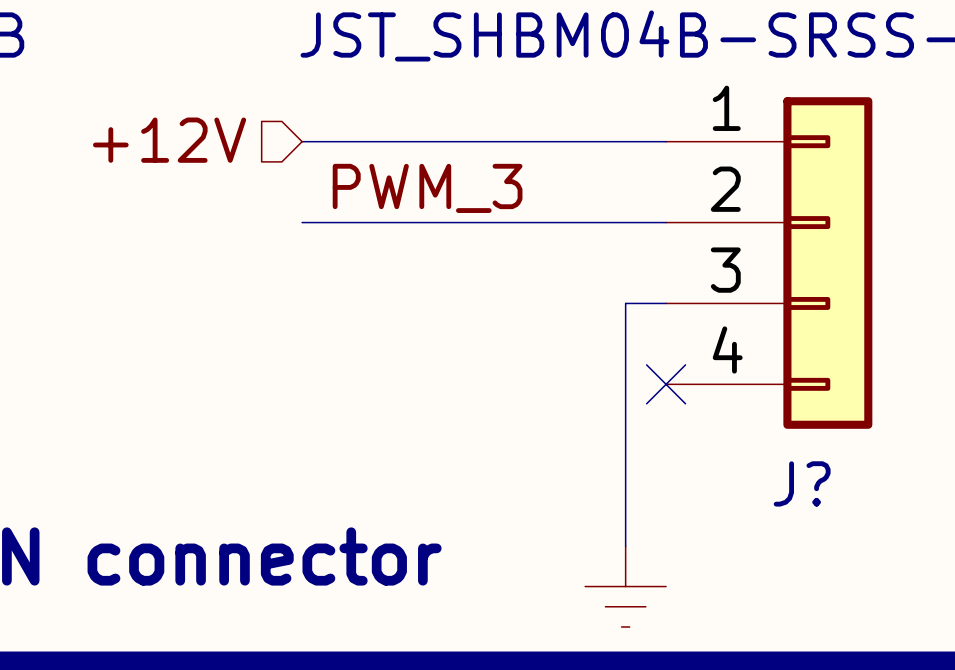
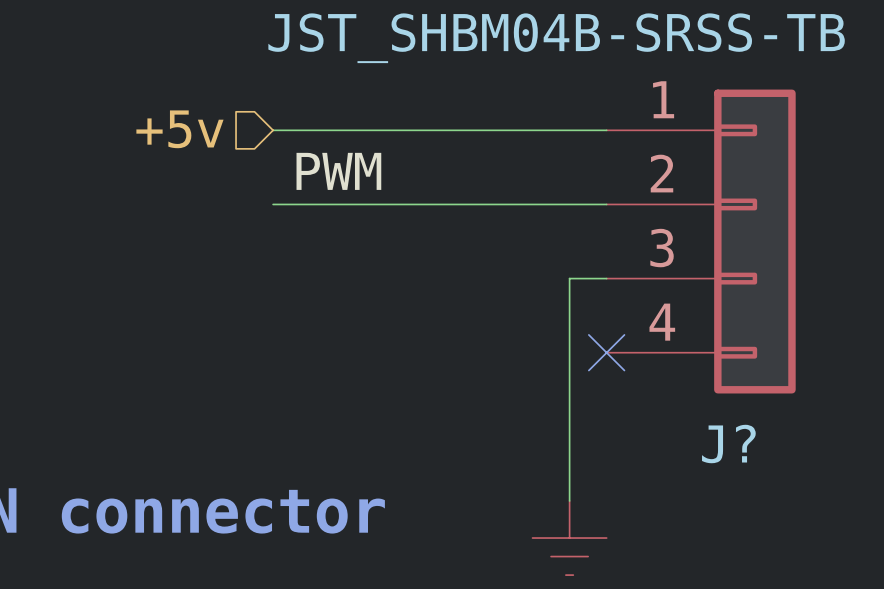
hierarchical label: +12V (169, 140) -> +5v (179, 129)
label: PWM_3 (427, 188) -> PWM (338, 171)

